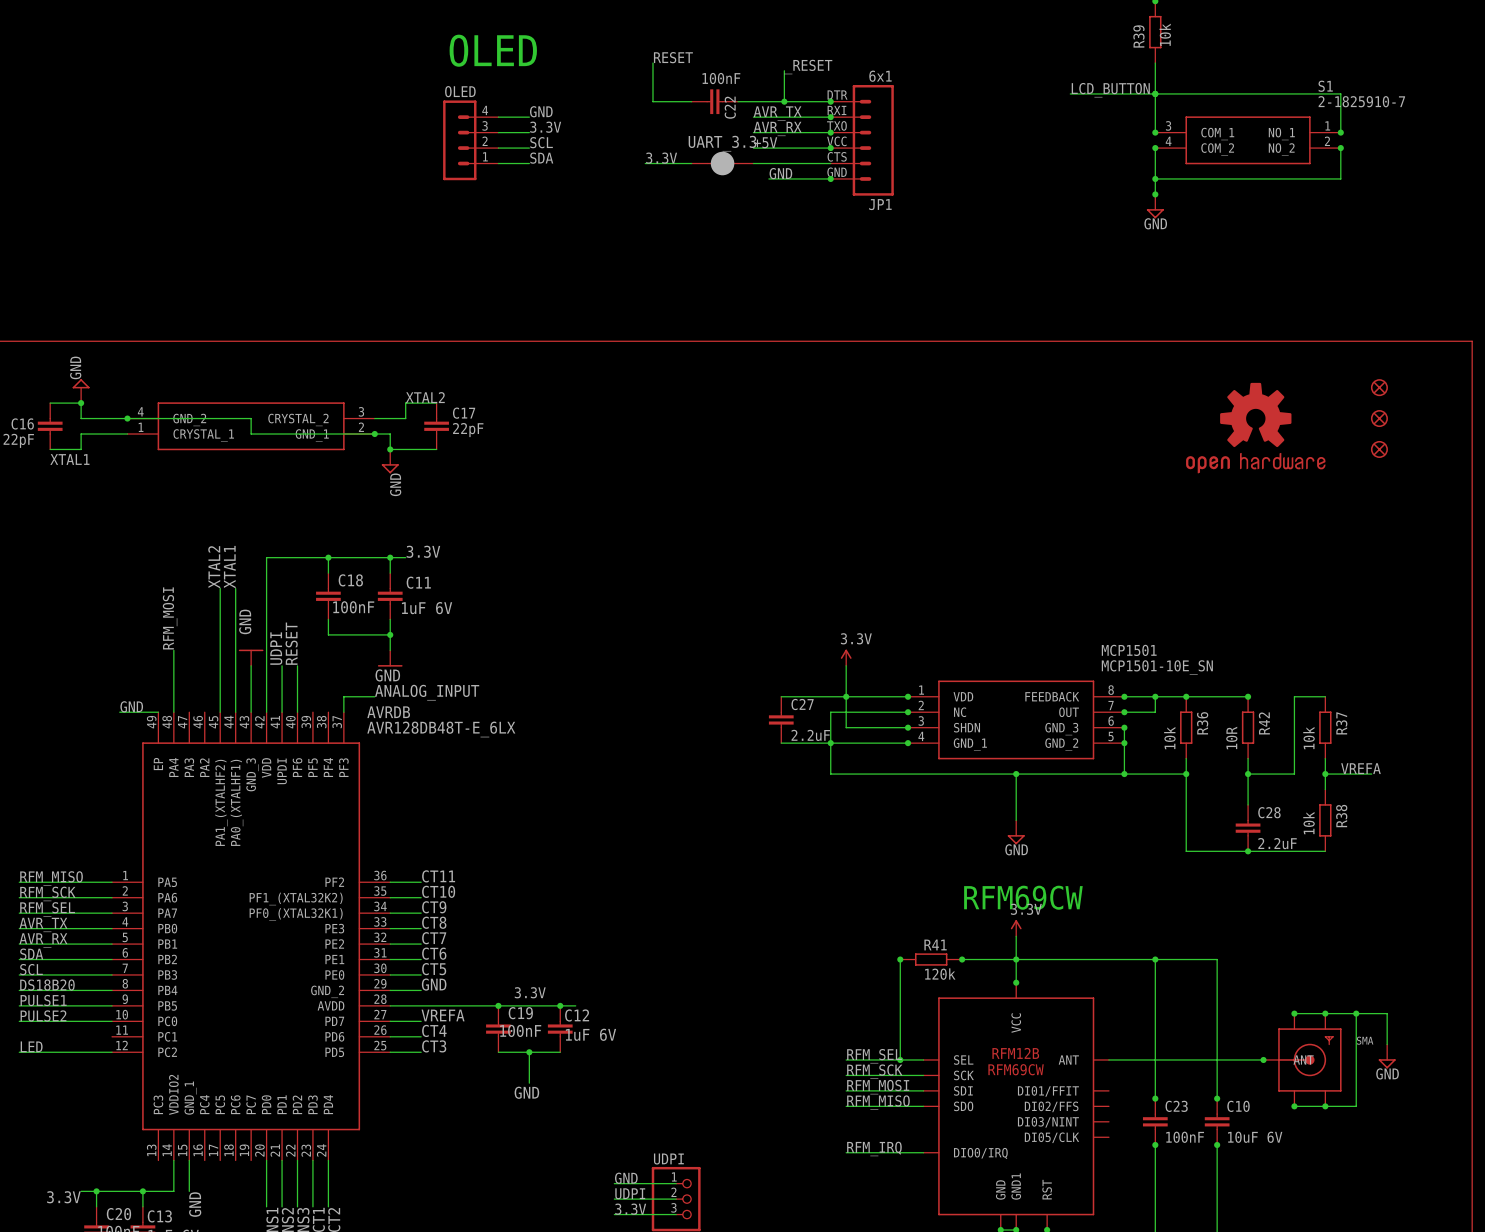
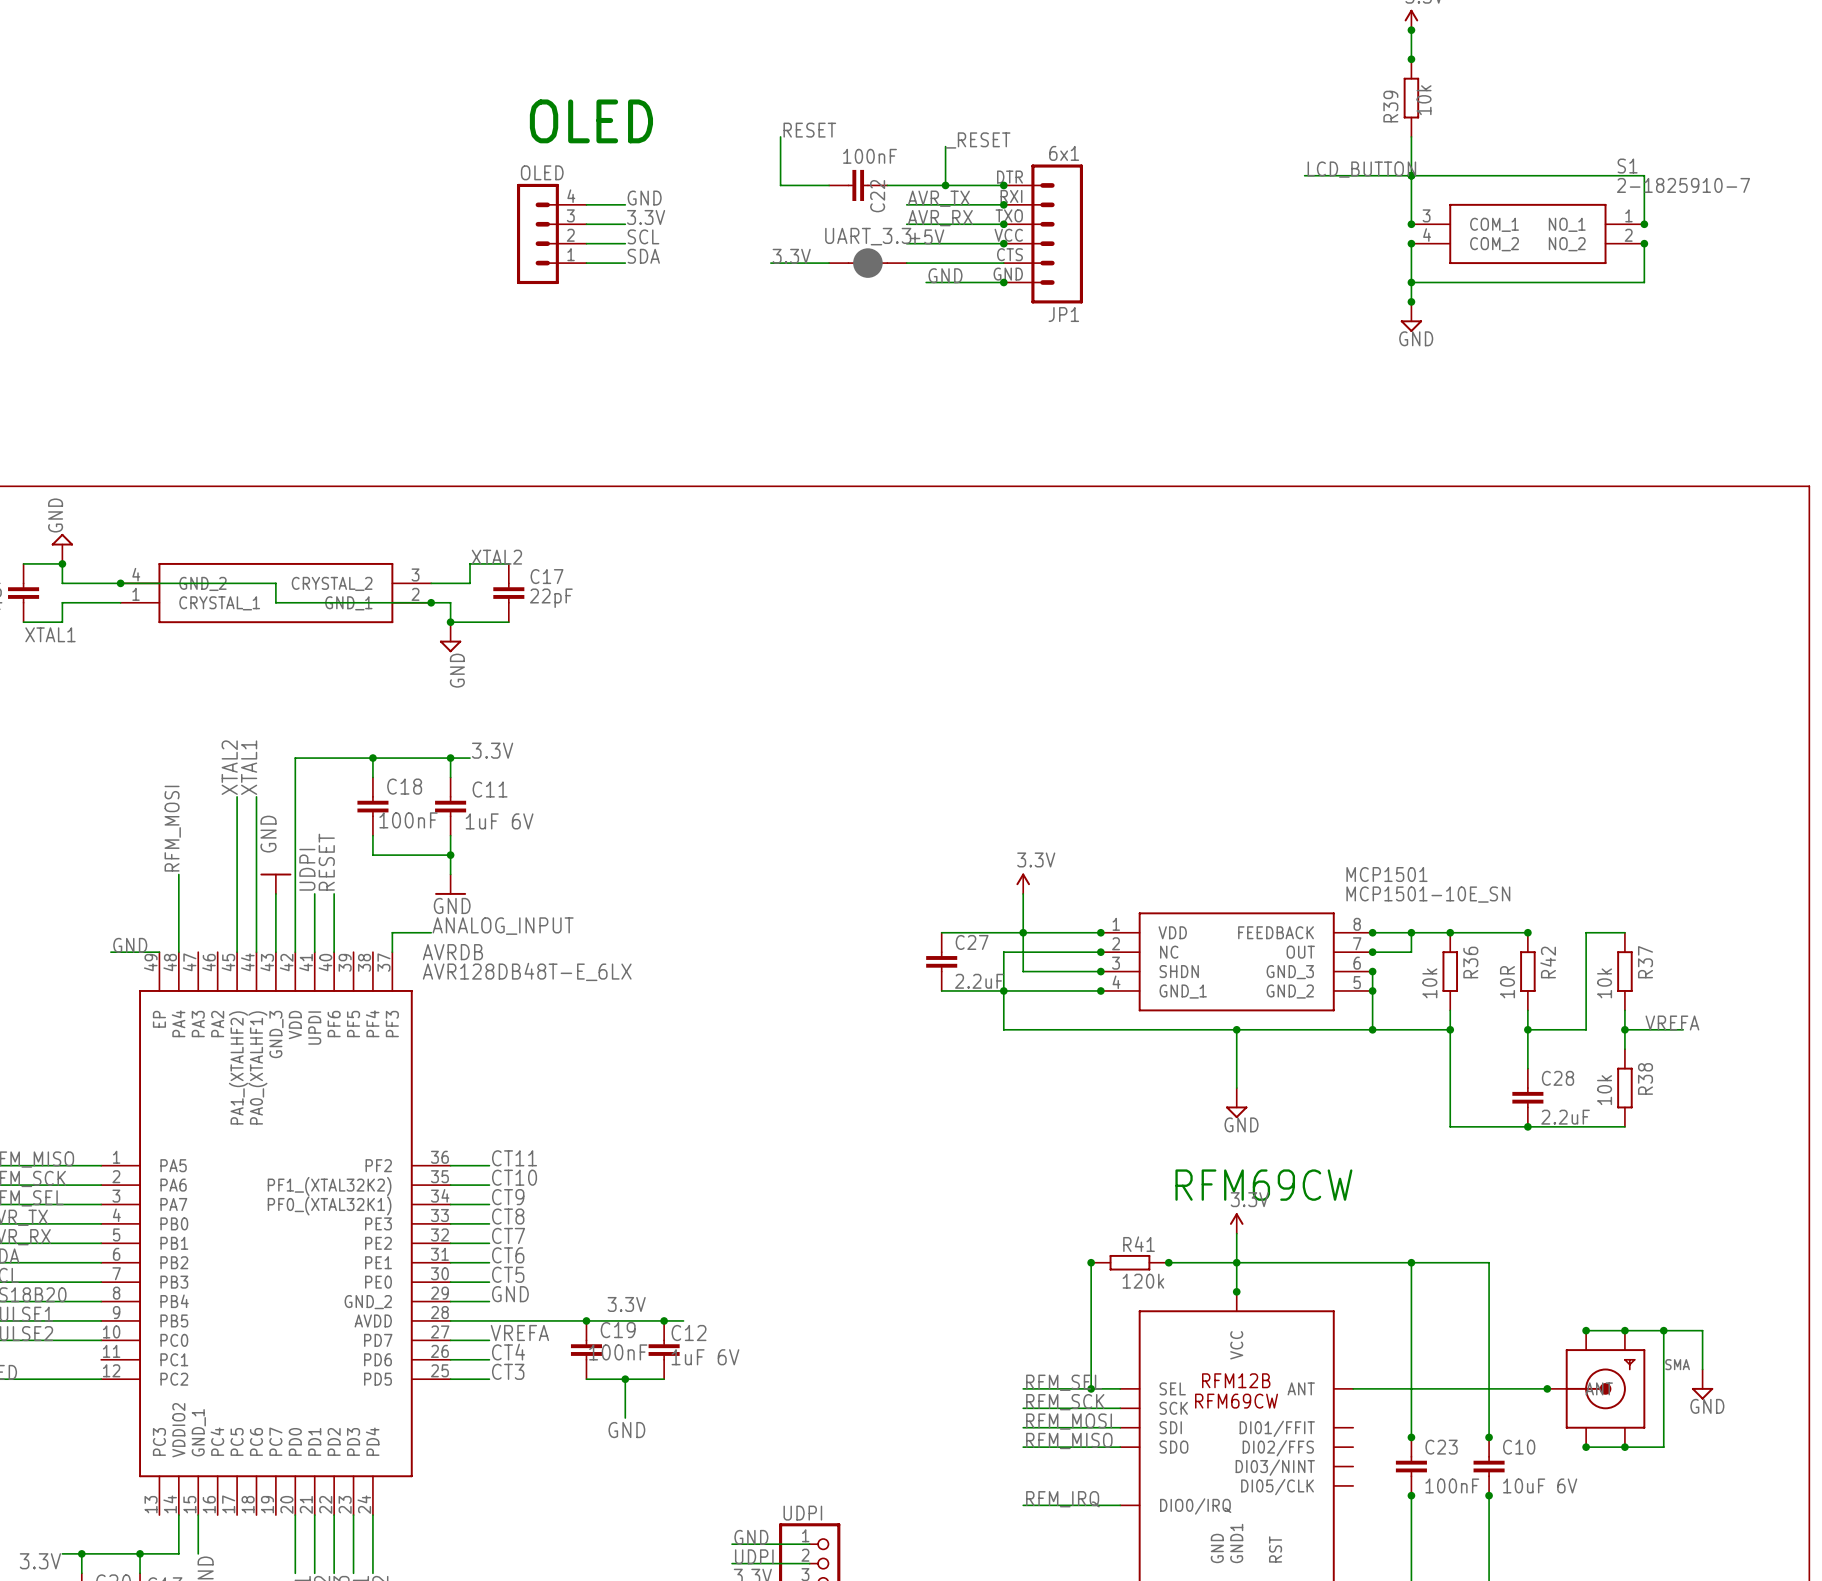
part: (1379, 387) -> none
part: (1379, 418) -> none
part: (1255, 428) -> none
part: (1379, 449) -> none

